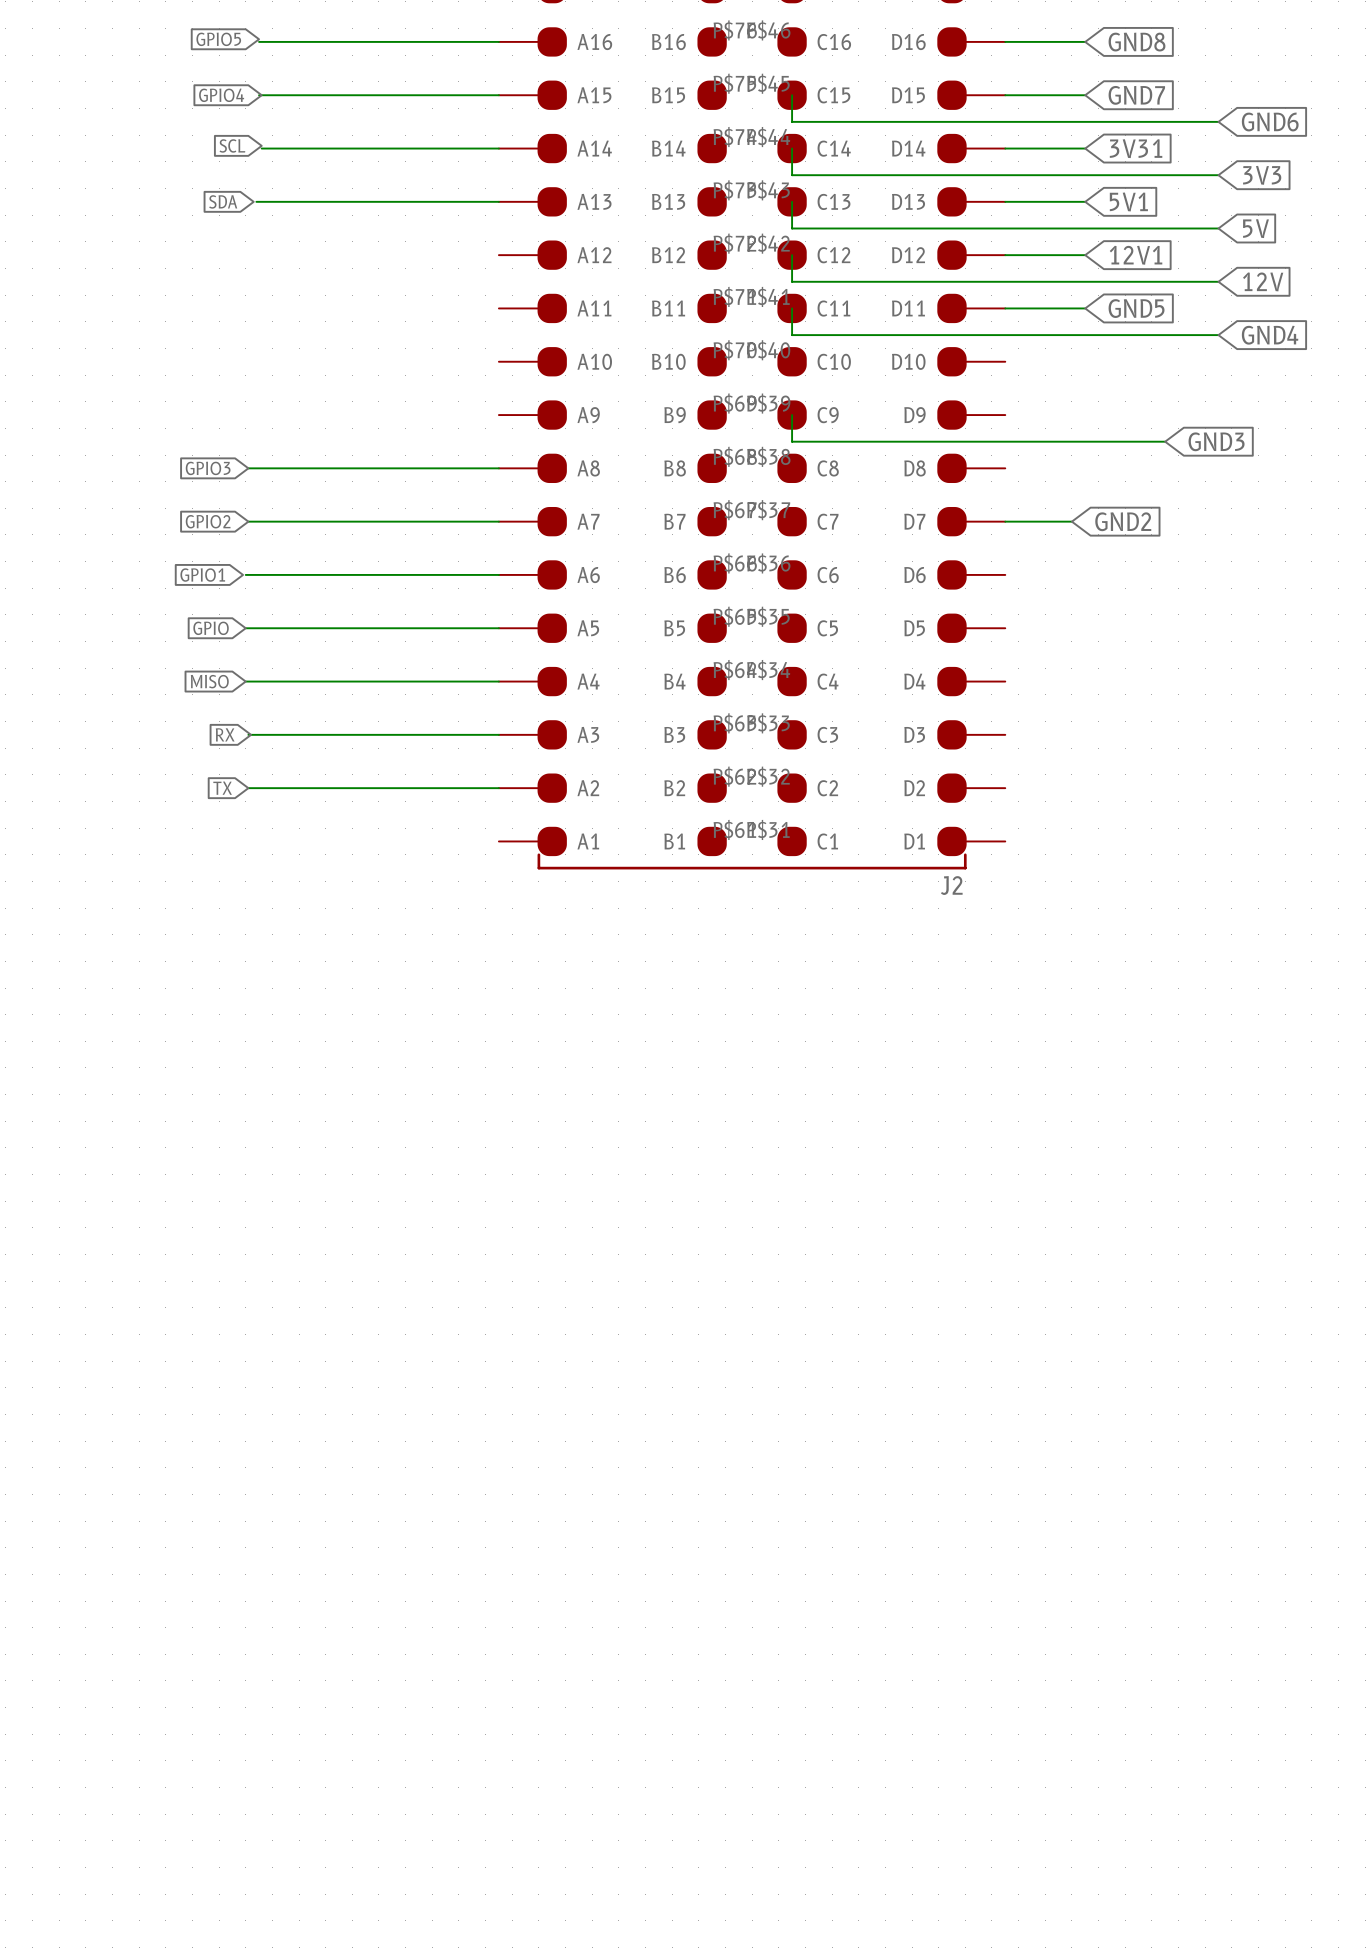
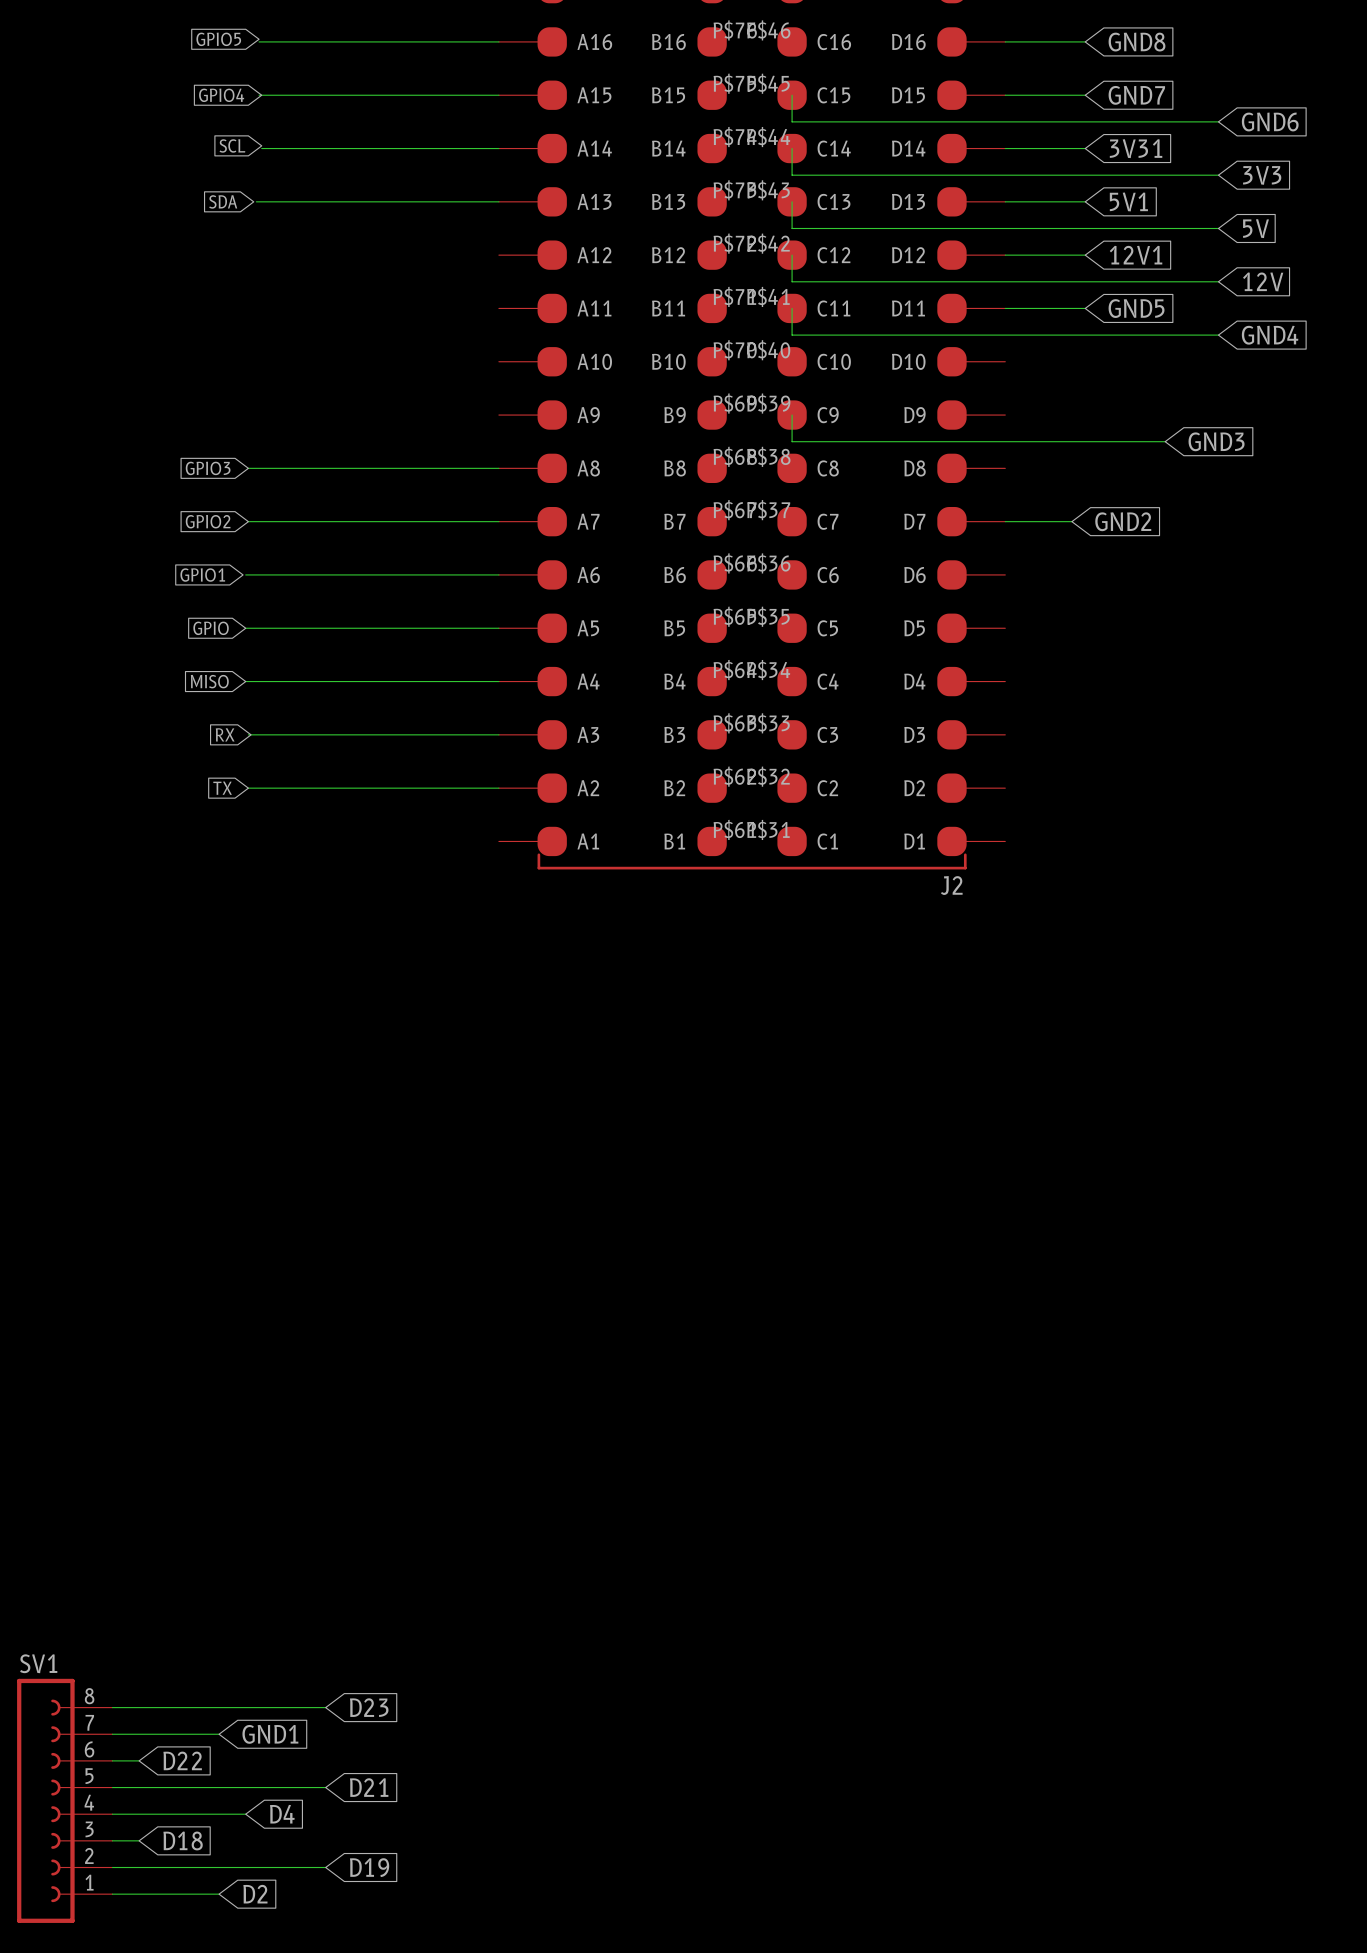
wire: none -> (112, 1707) (325, 1707)
global label: none -> D23 (369, 1707)
wire: none -> (112, 1734) (219, 1734)
global label: none -> GND1 (270, 1734)
wire: none -> (112, 1760) (139, 1760)
global label: none -> D22 (182, 1760)
wire: none -> (112, 1787) (325, 1787)
global label: none -> D21 (369, 1787)
SV1: none -> (64, 1800)
wire: none -> (112, 1814) (245, 1814)
global label: none -> D4 (282, 1814)
wire: none -> (112, 1840) (139, 1840)
global label: none -> D18 (183, 1840)
wire: none -> (112, 1867) (325, 1867)
global label: none -> D19 (369, 1867)
wire: none -> (112, 1894) (219, 1894)
global label: none -> D2 (255, 1894)

